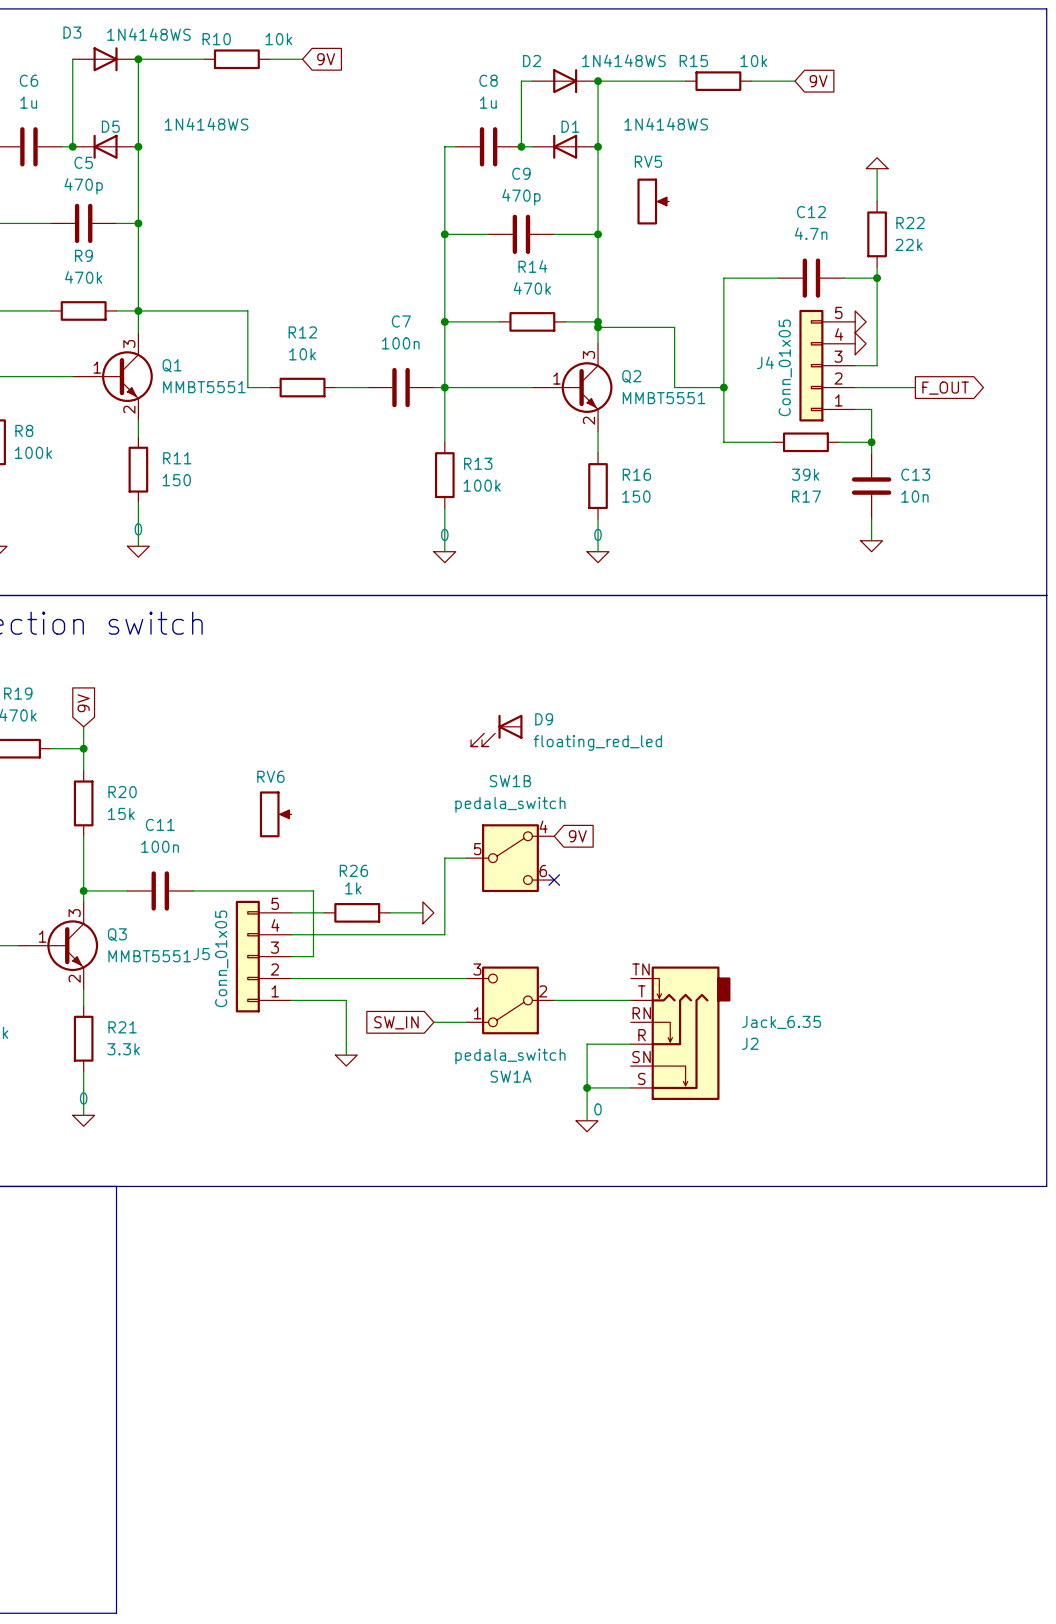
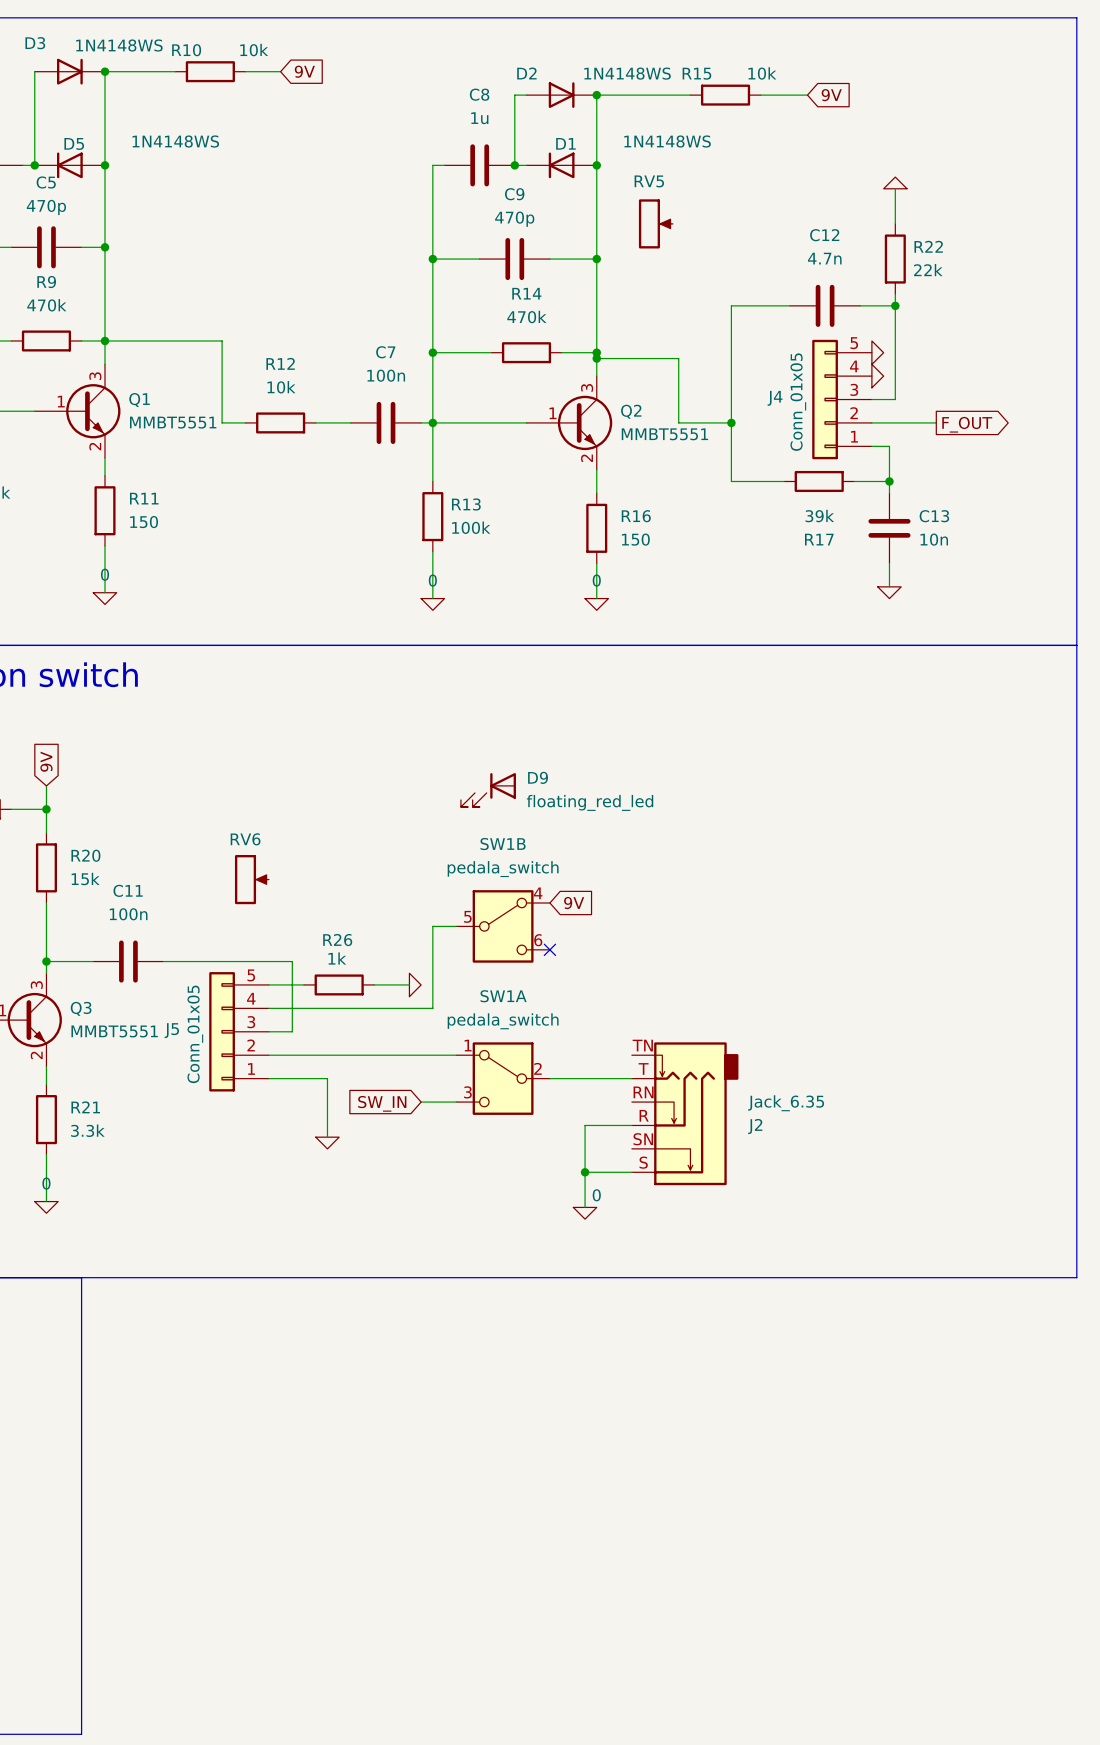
SW1A flip: as is (510, 1000) -> up-down (503, 1078)

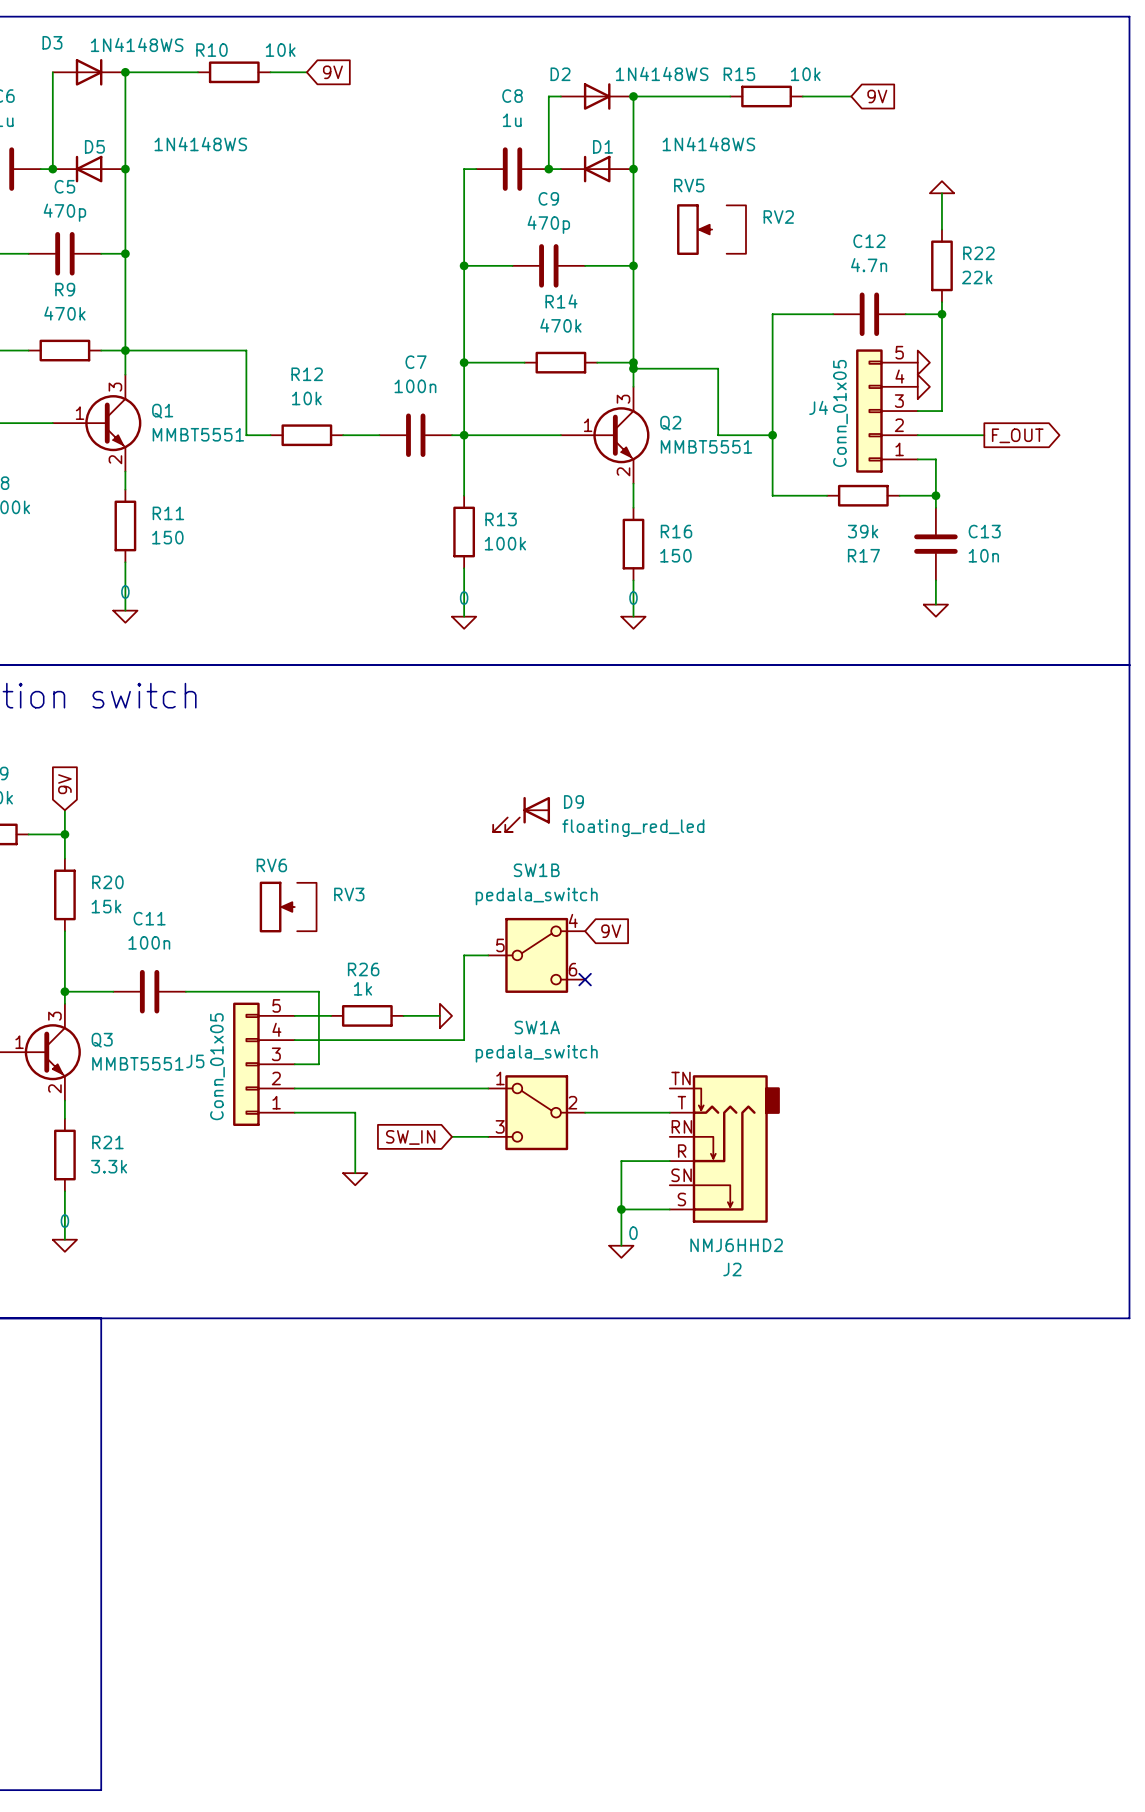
RV2: none -> (736, 229)
RV3: none -> (306, 907)
J2 value: Jack_6.35 (786, 1103) -> NMJ6HHD2 (736, 1245)
J2 name position: J2 (755, 1126) -> J2 (732, 1269)

